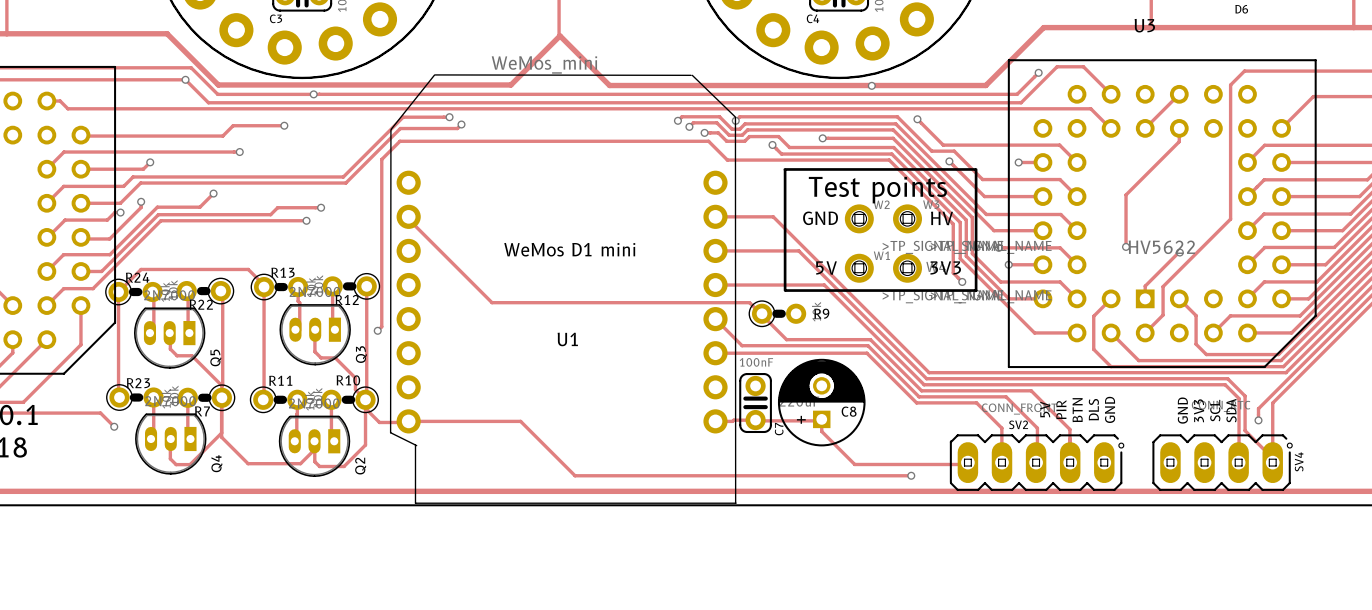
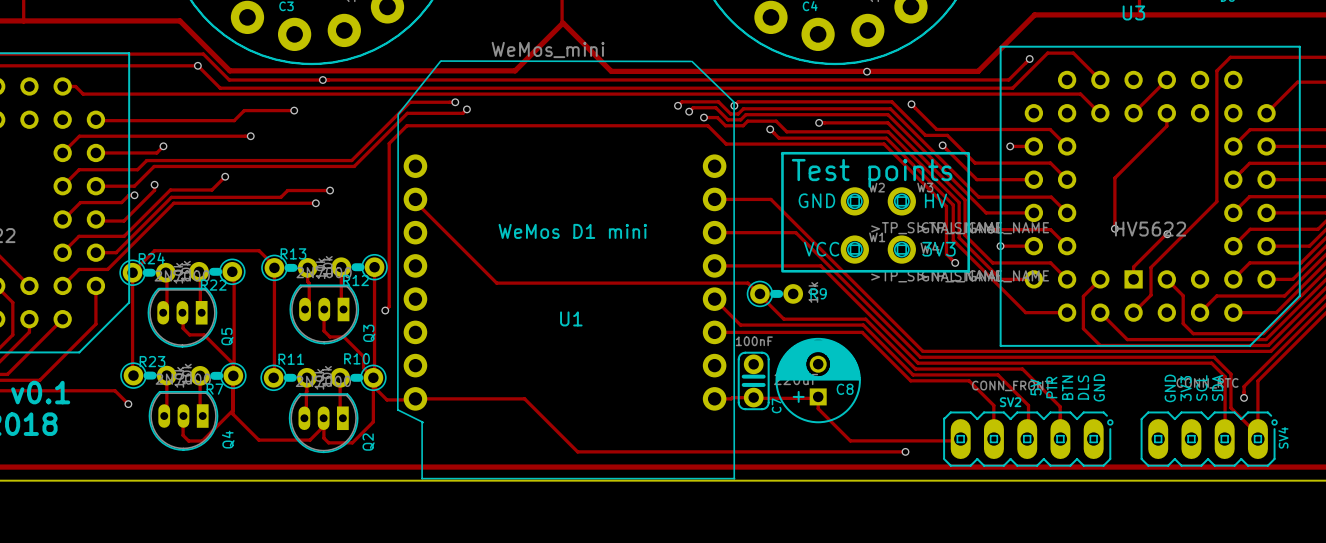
W1 value: 5V (826, 267) -> VCC (821, 249)

